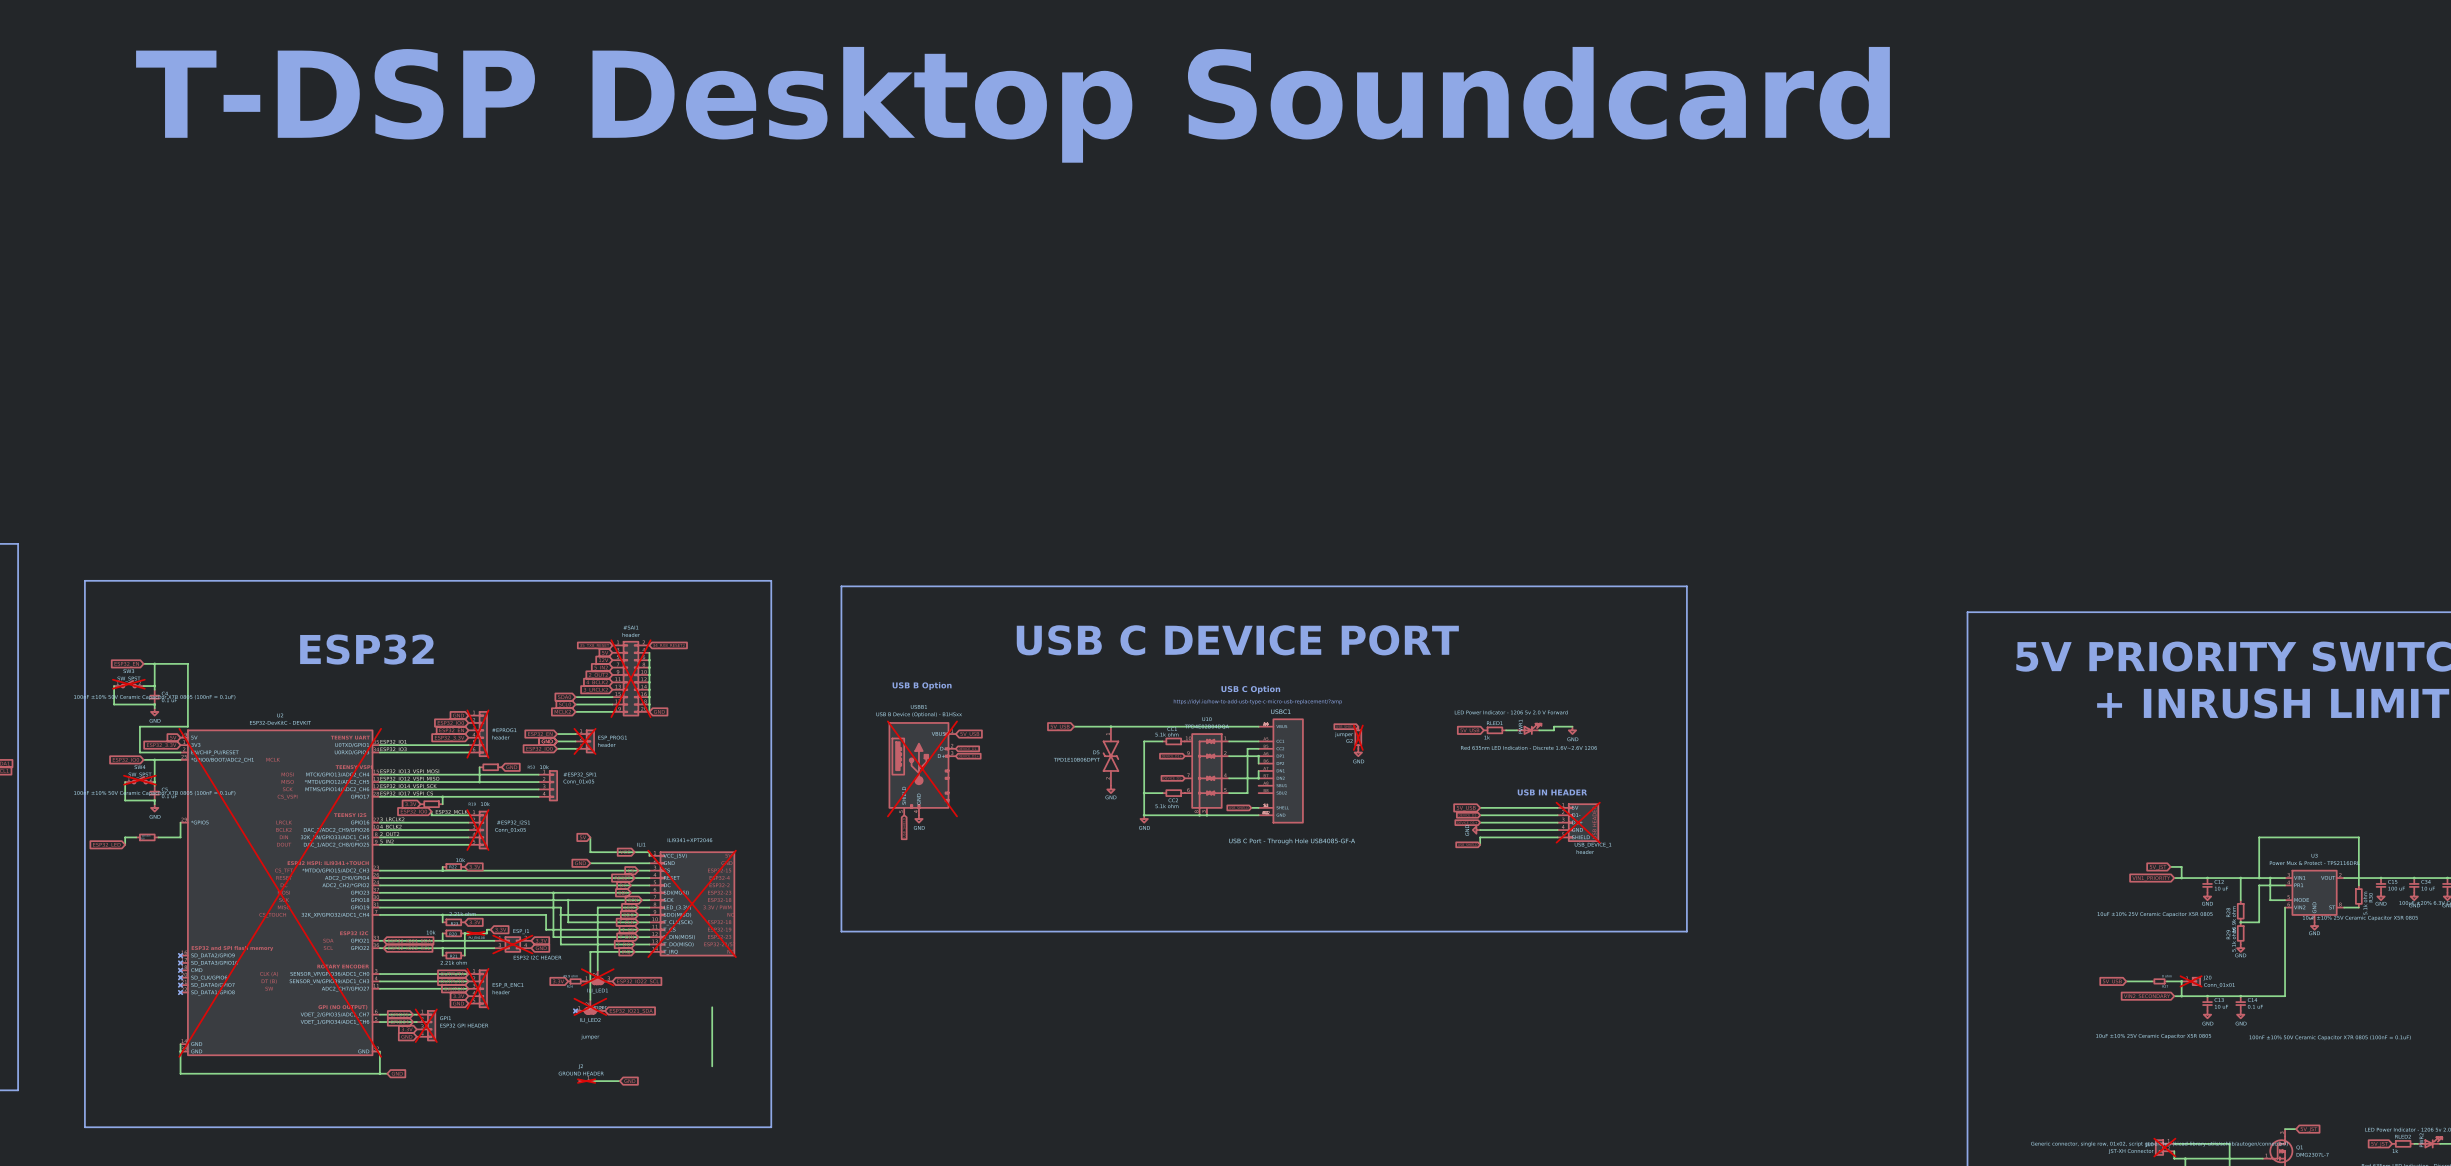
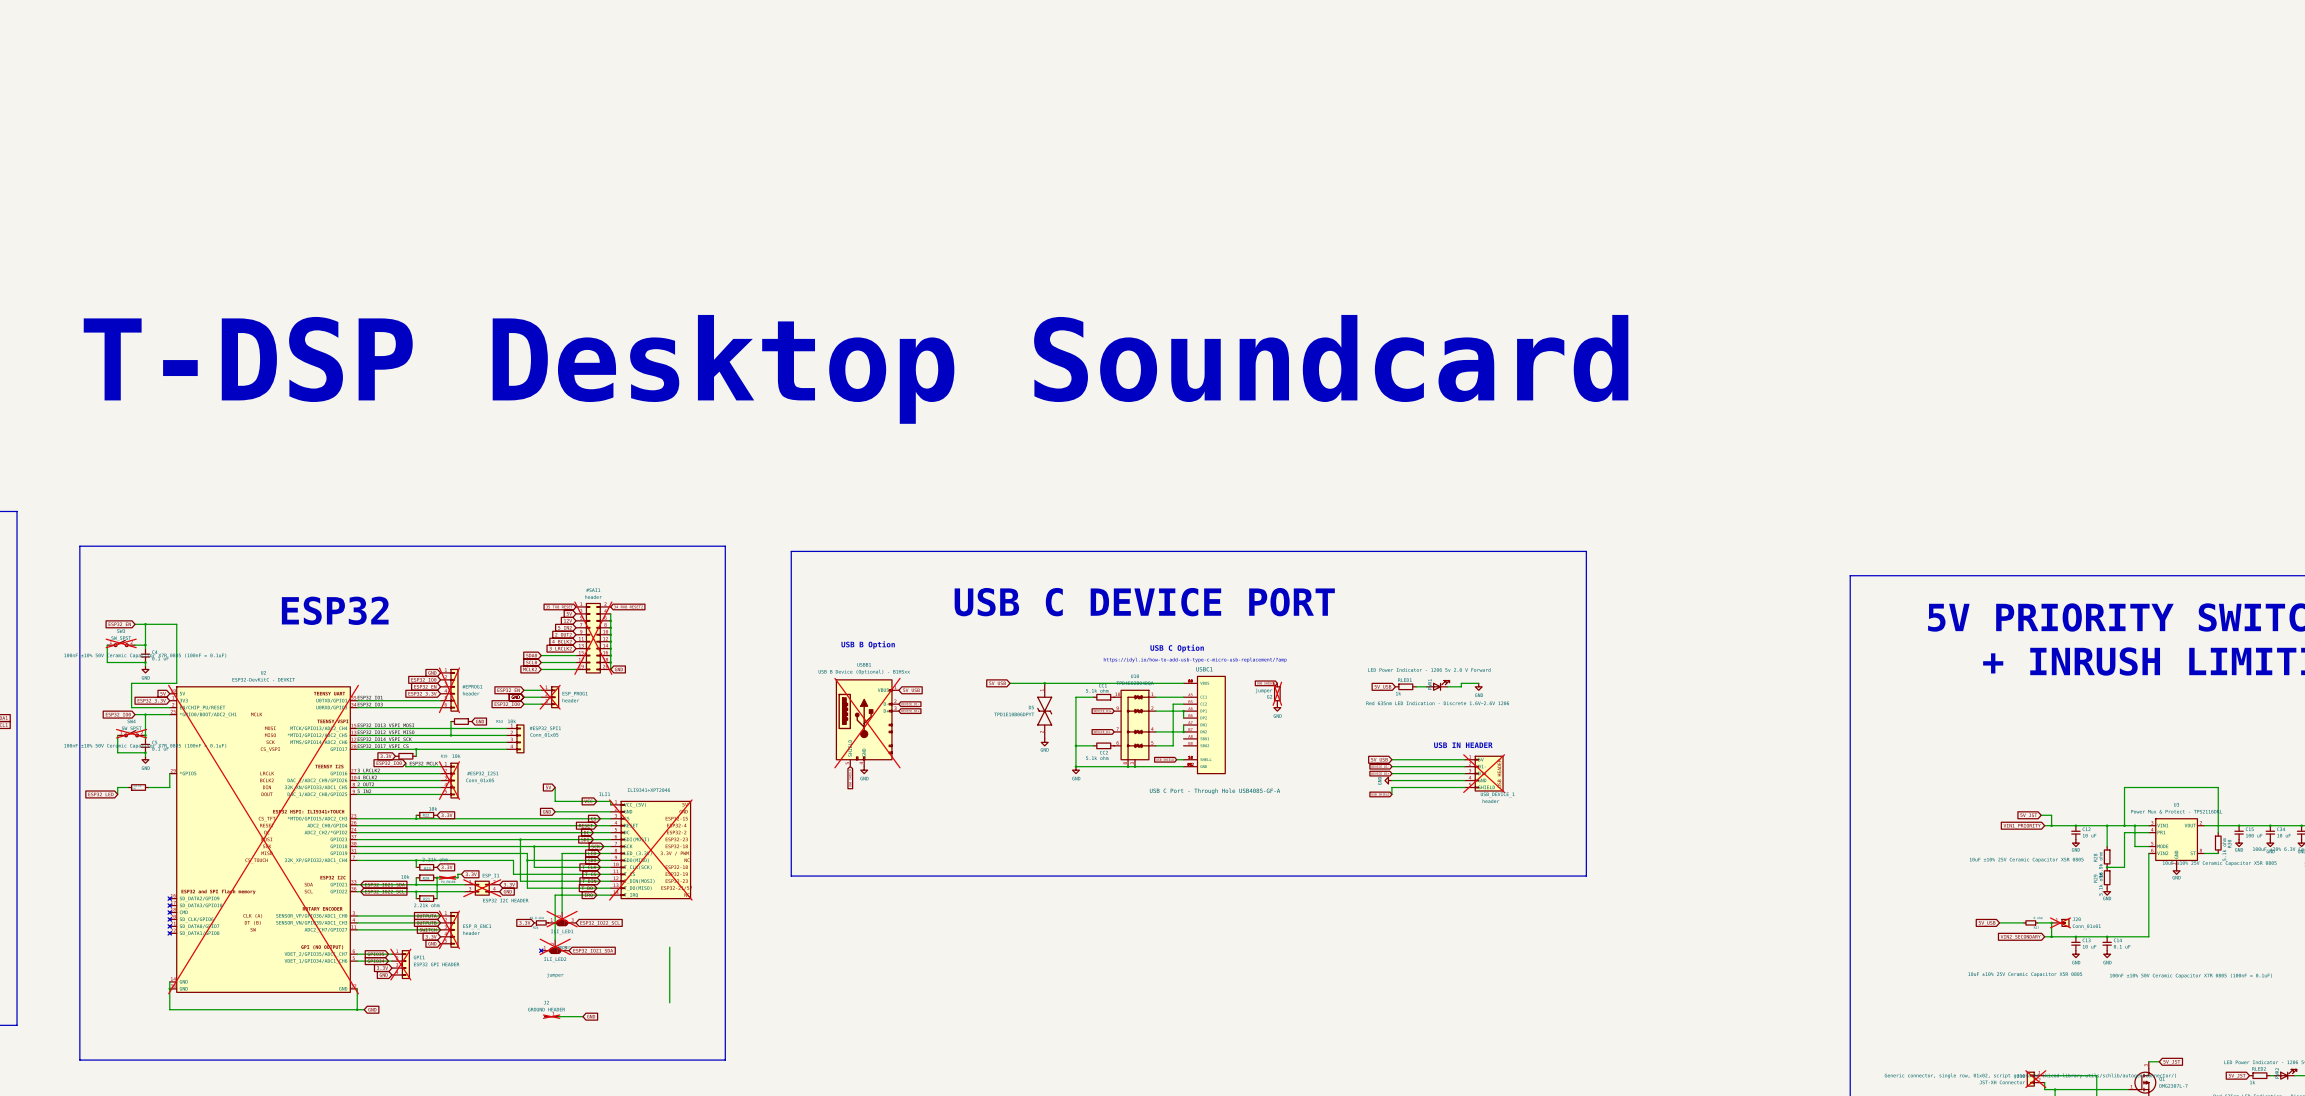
text: T-DSP Desktop Soundcard (1012, 104) -> none
text: none -> T-DSP Desktop Soundcard (856, 369)

